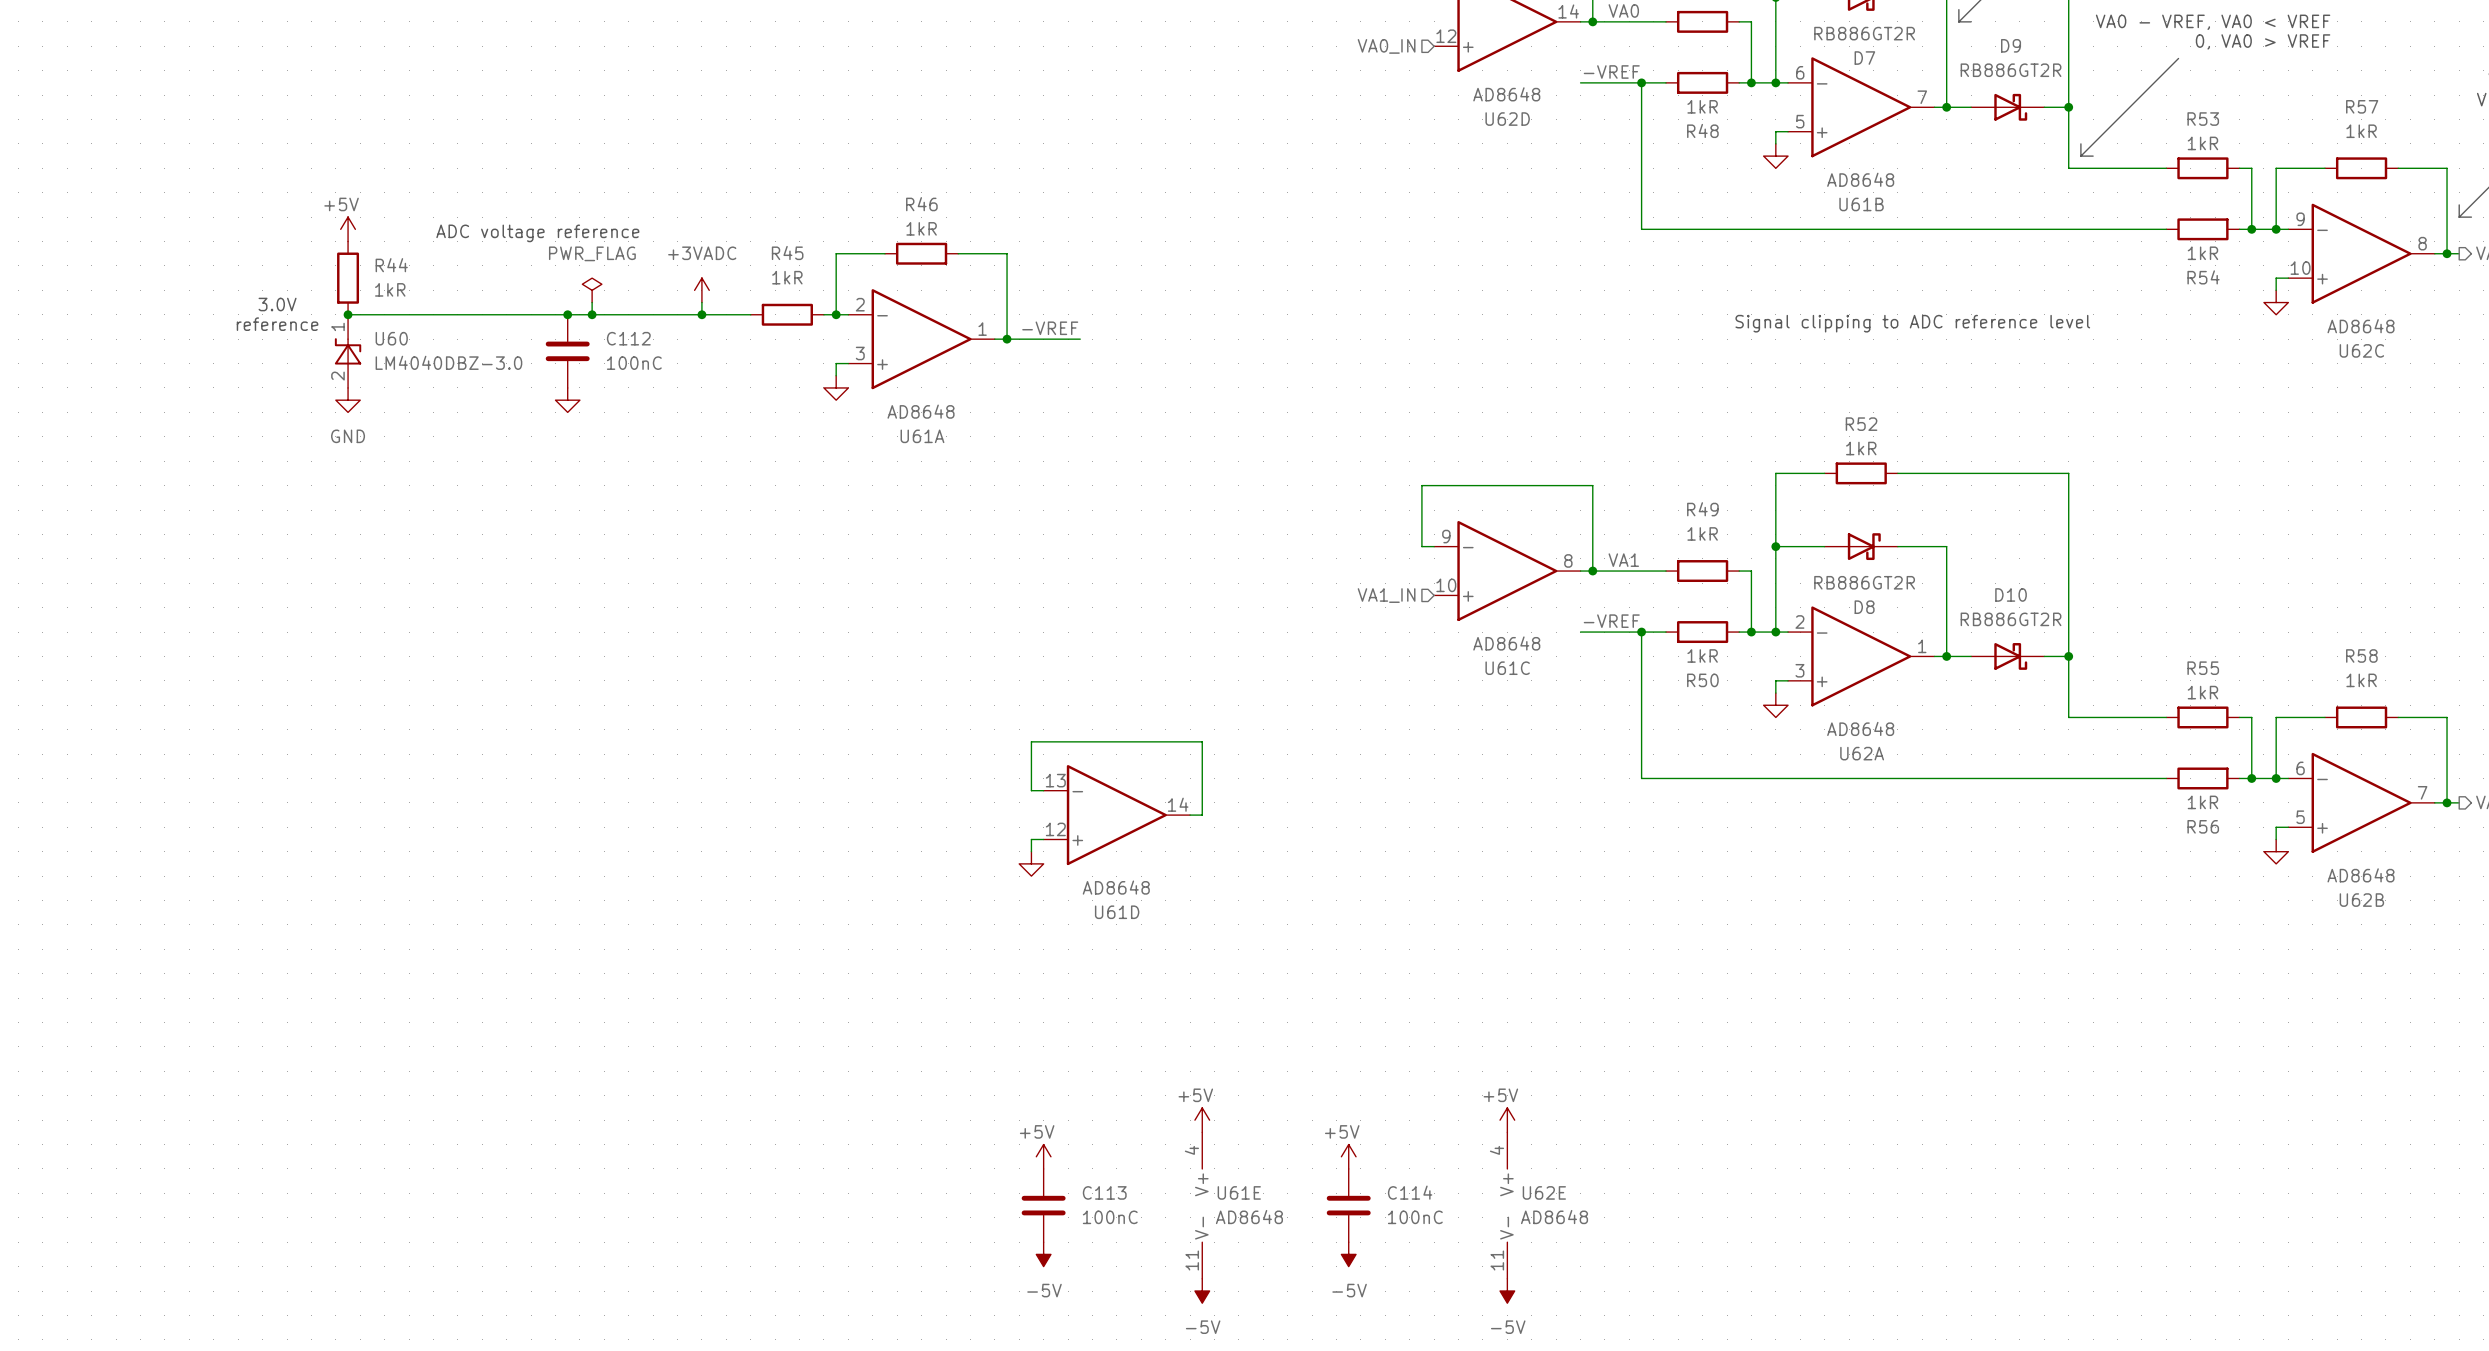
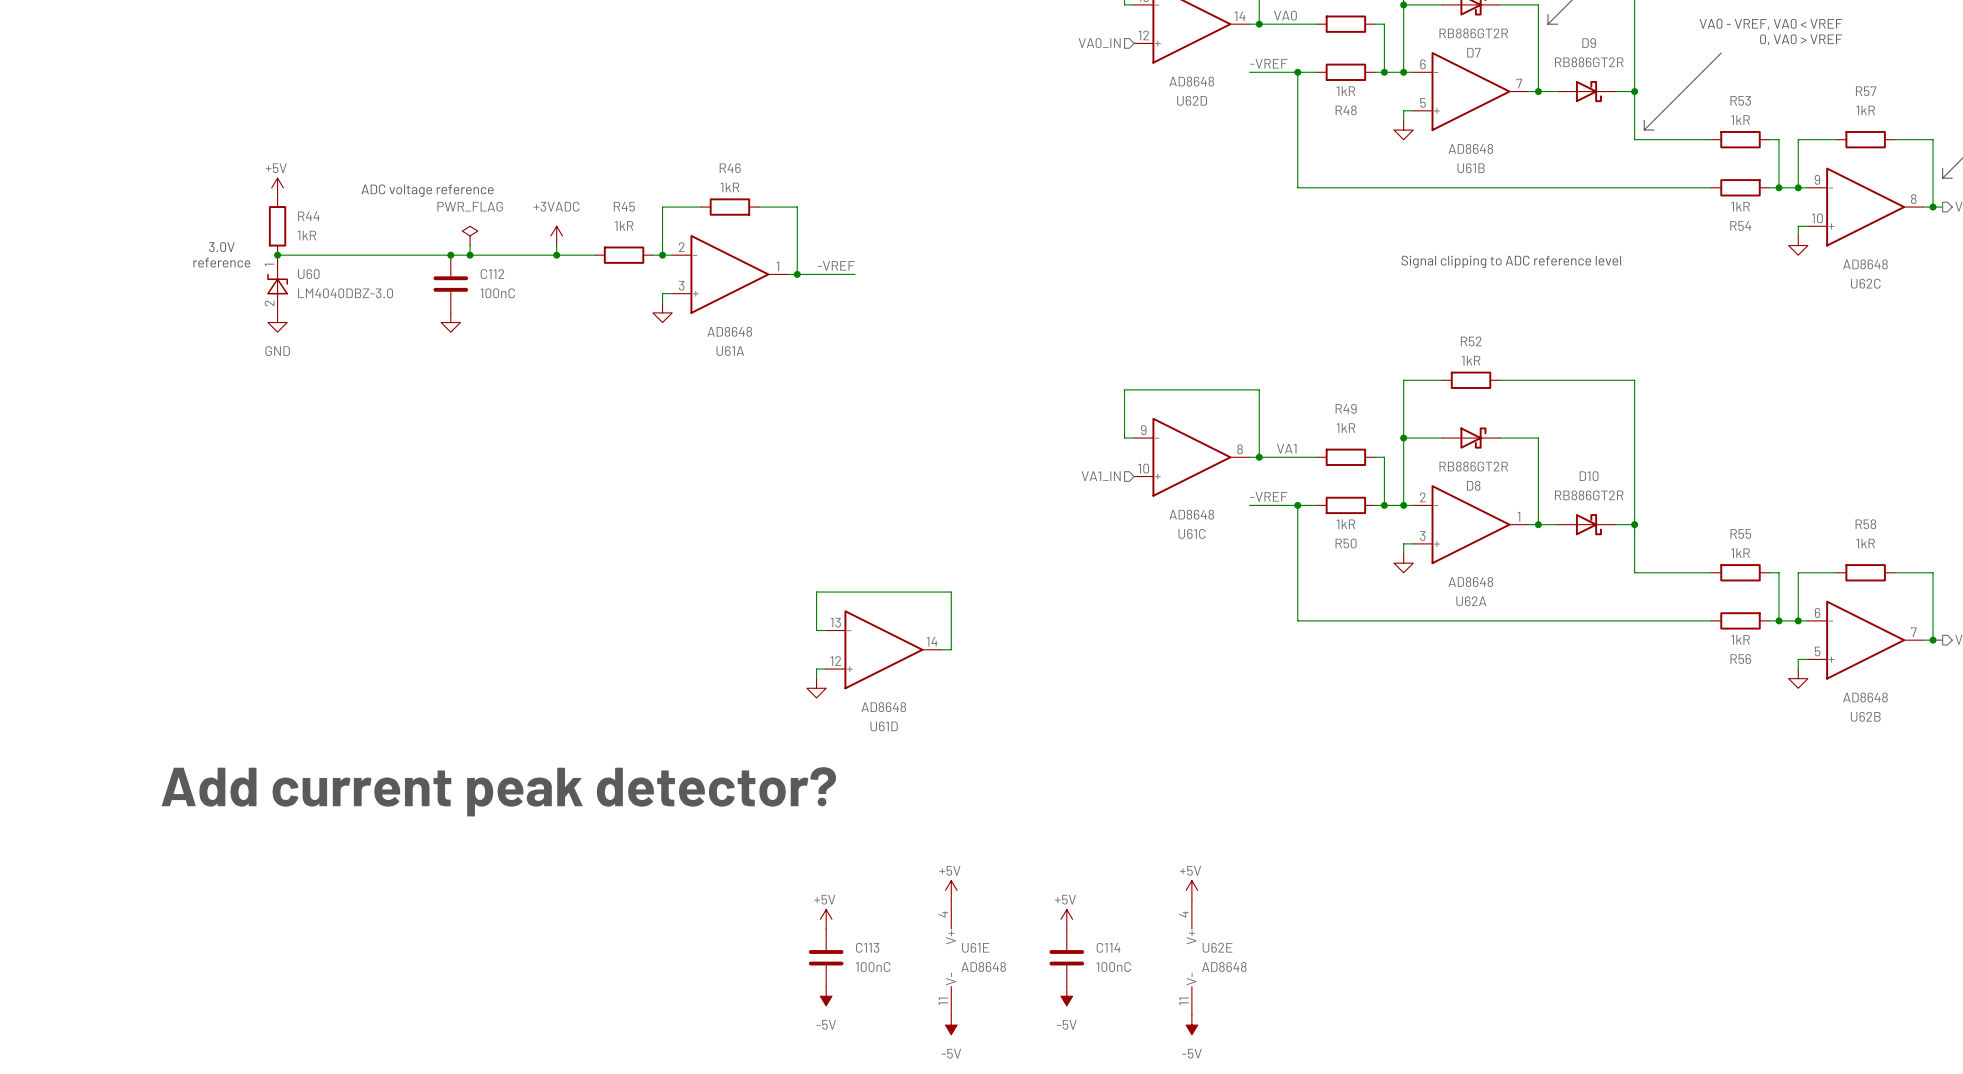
text: none -> Add current peak detector? (498, 791)

